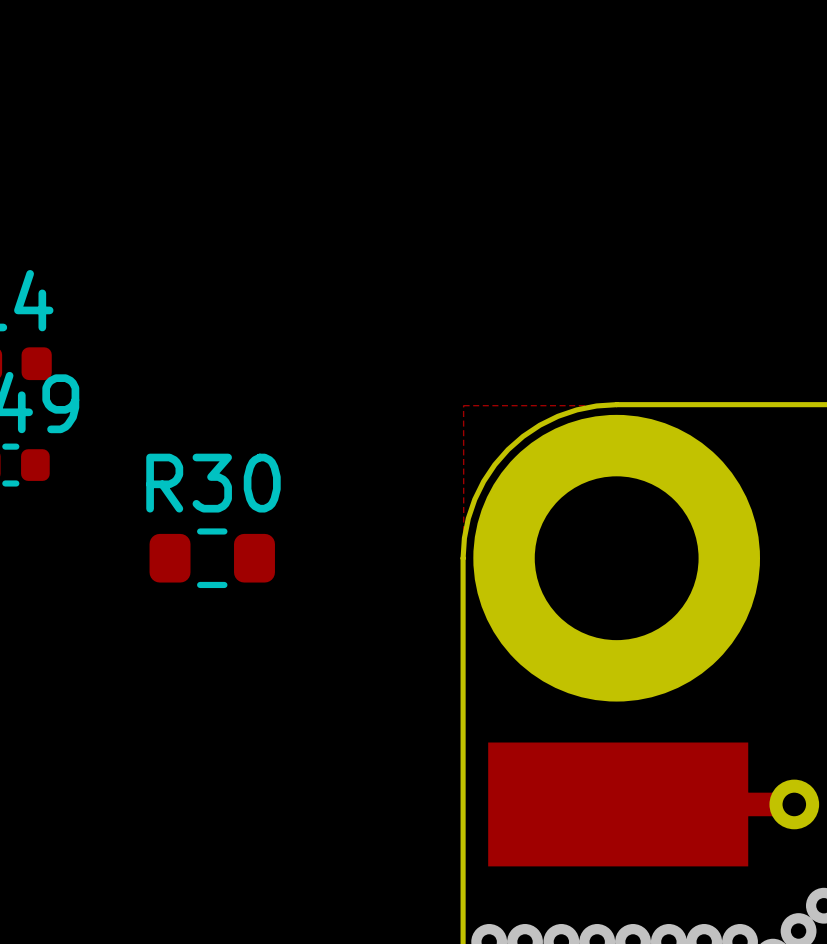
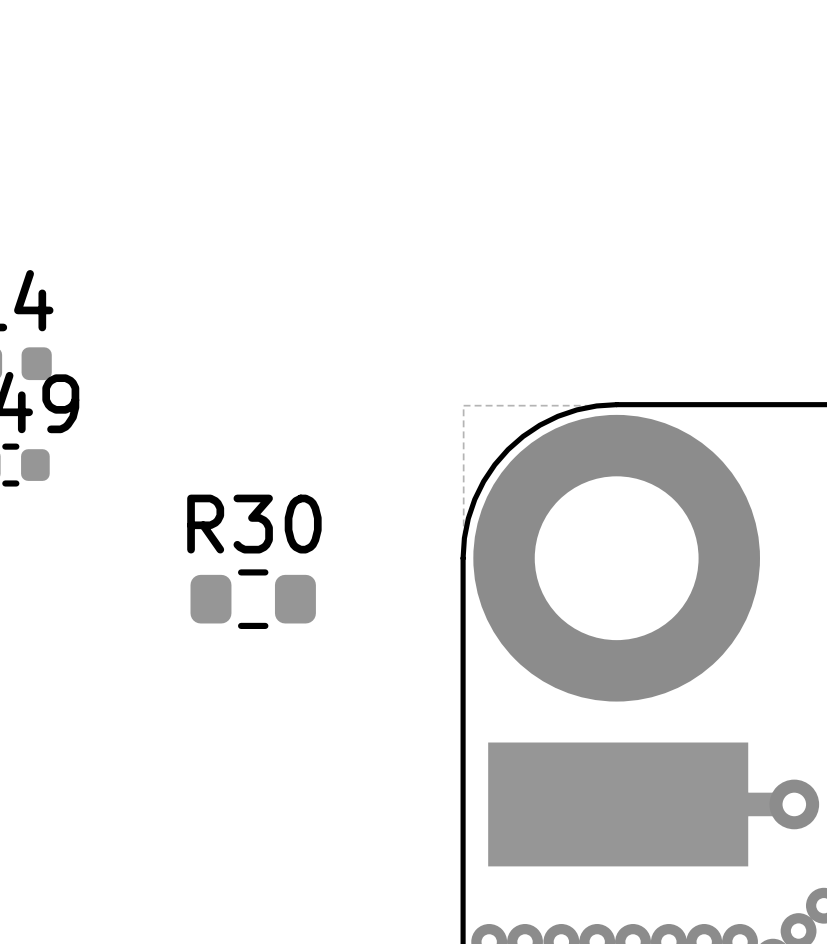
R30 position: (212, 558) -> (253, 599)

